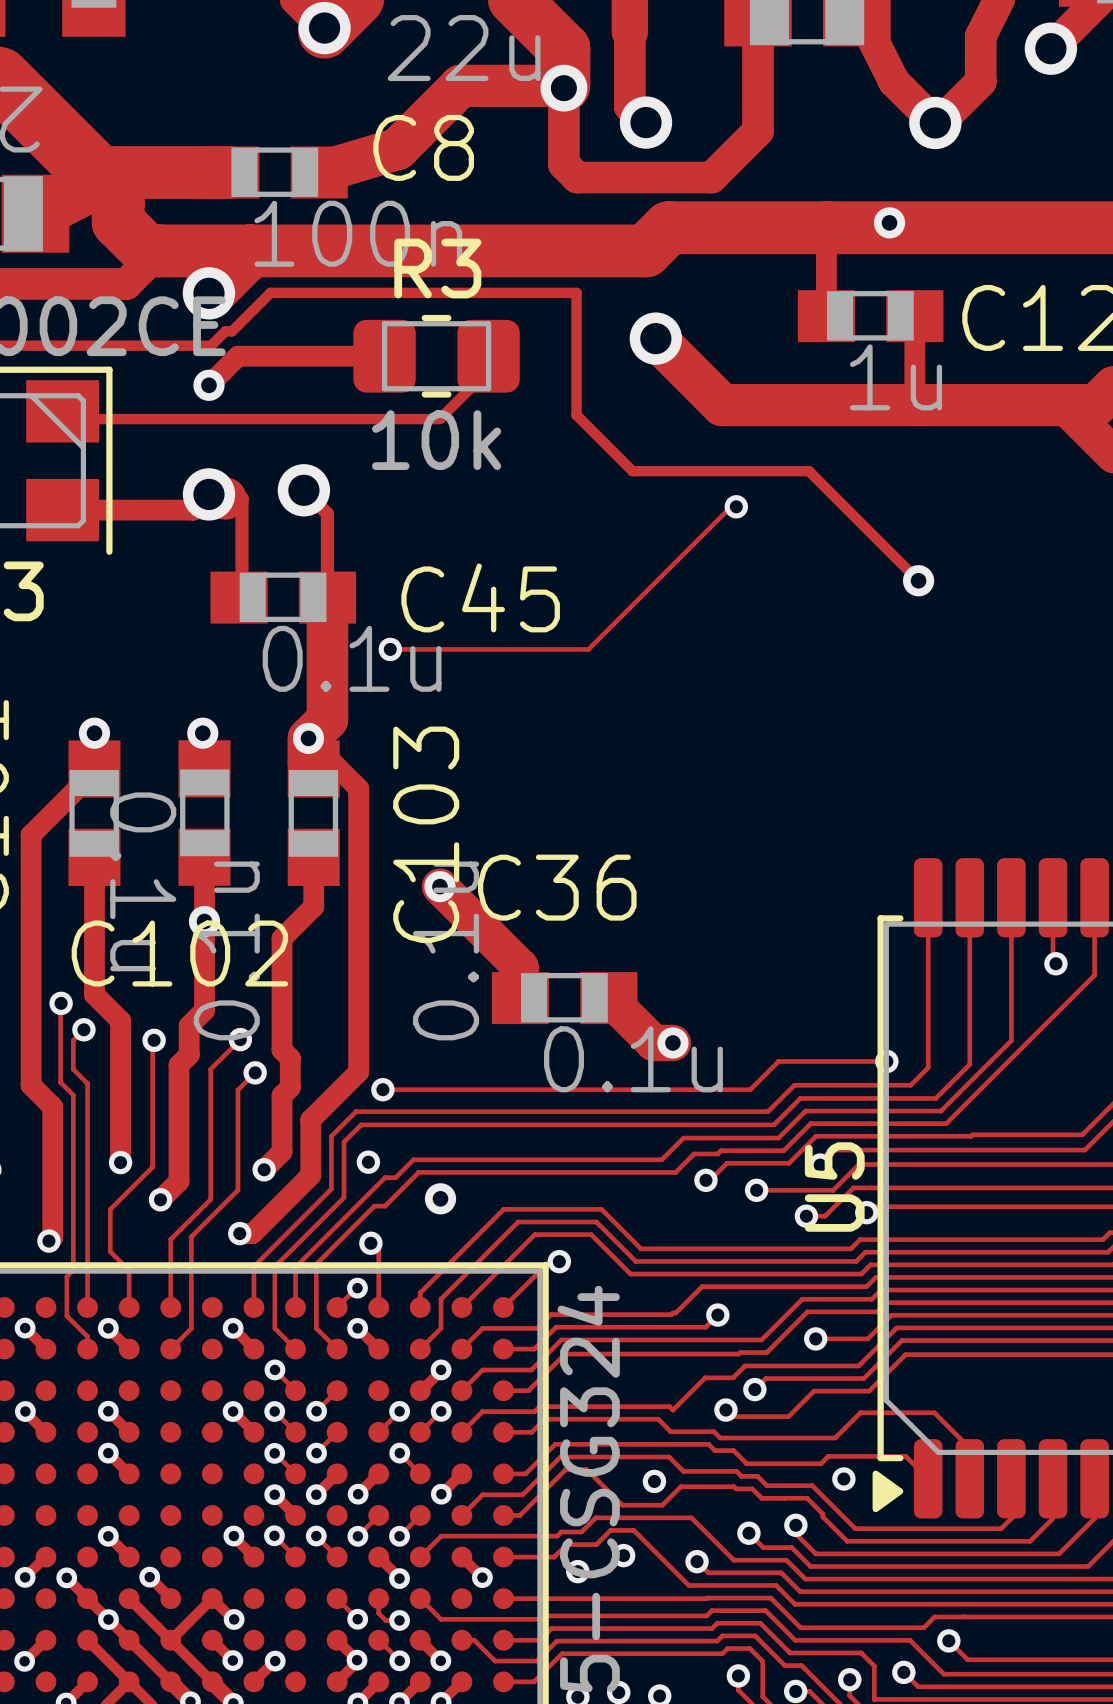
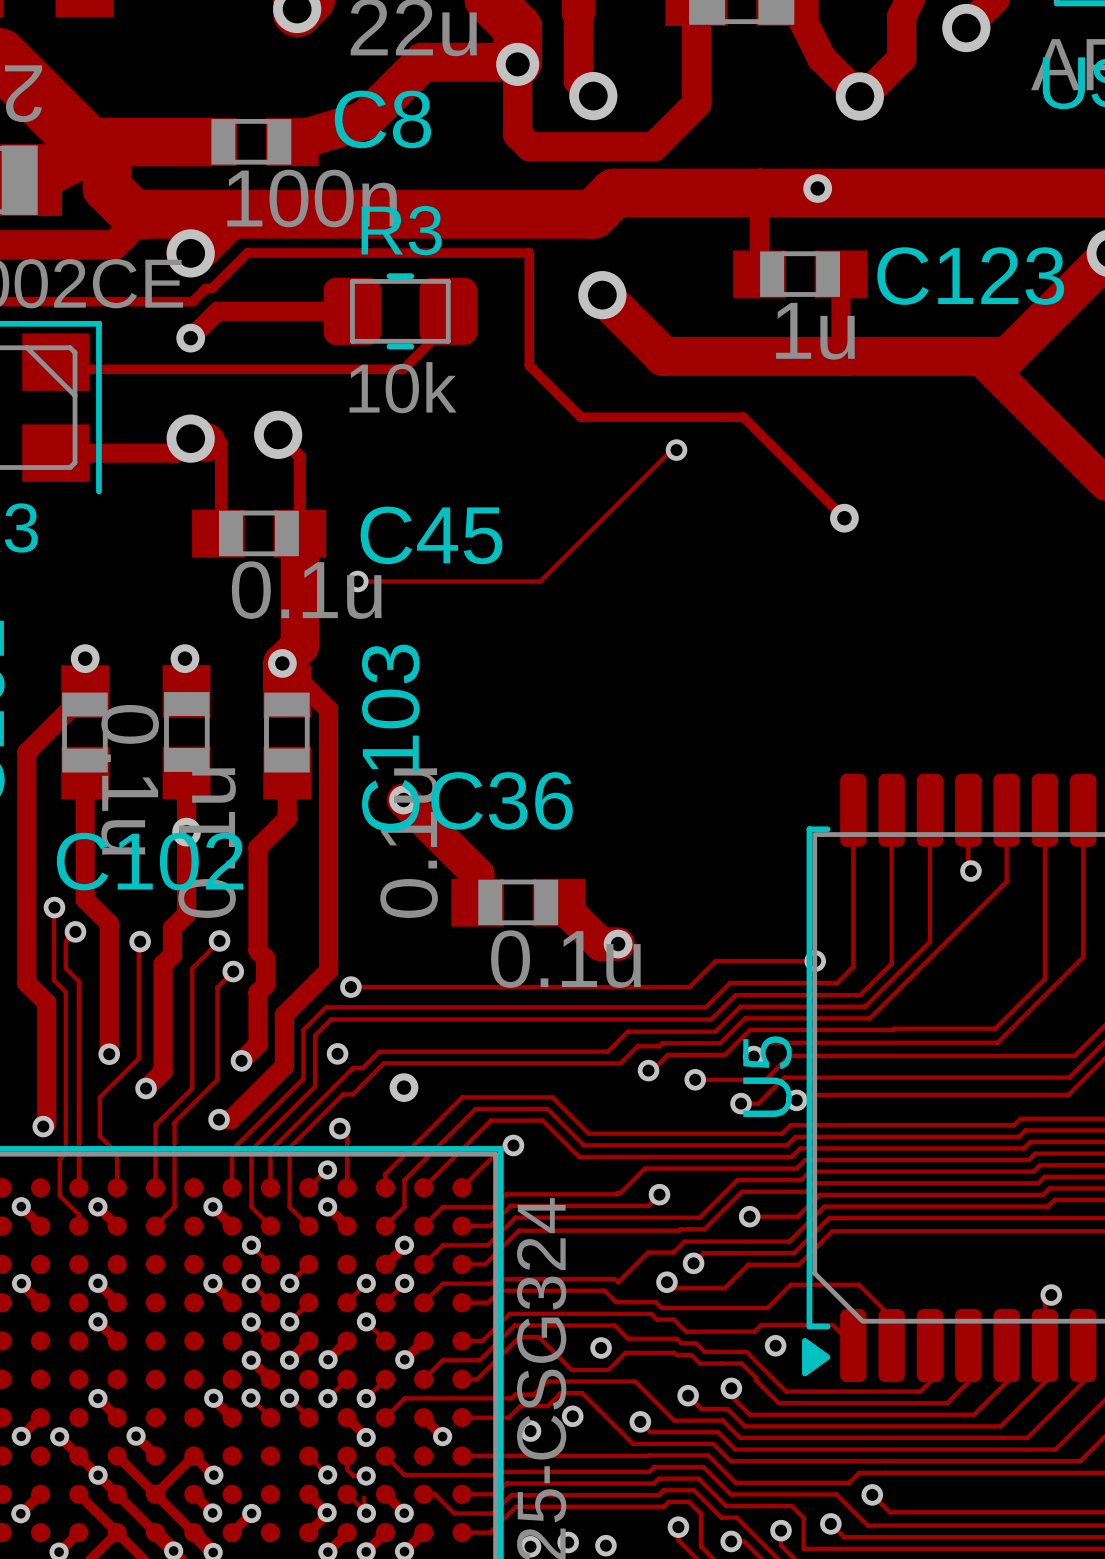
track: none -> (364, 1497) (364, 1510)

